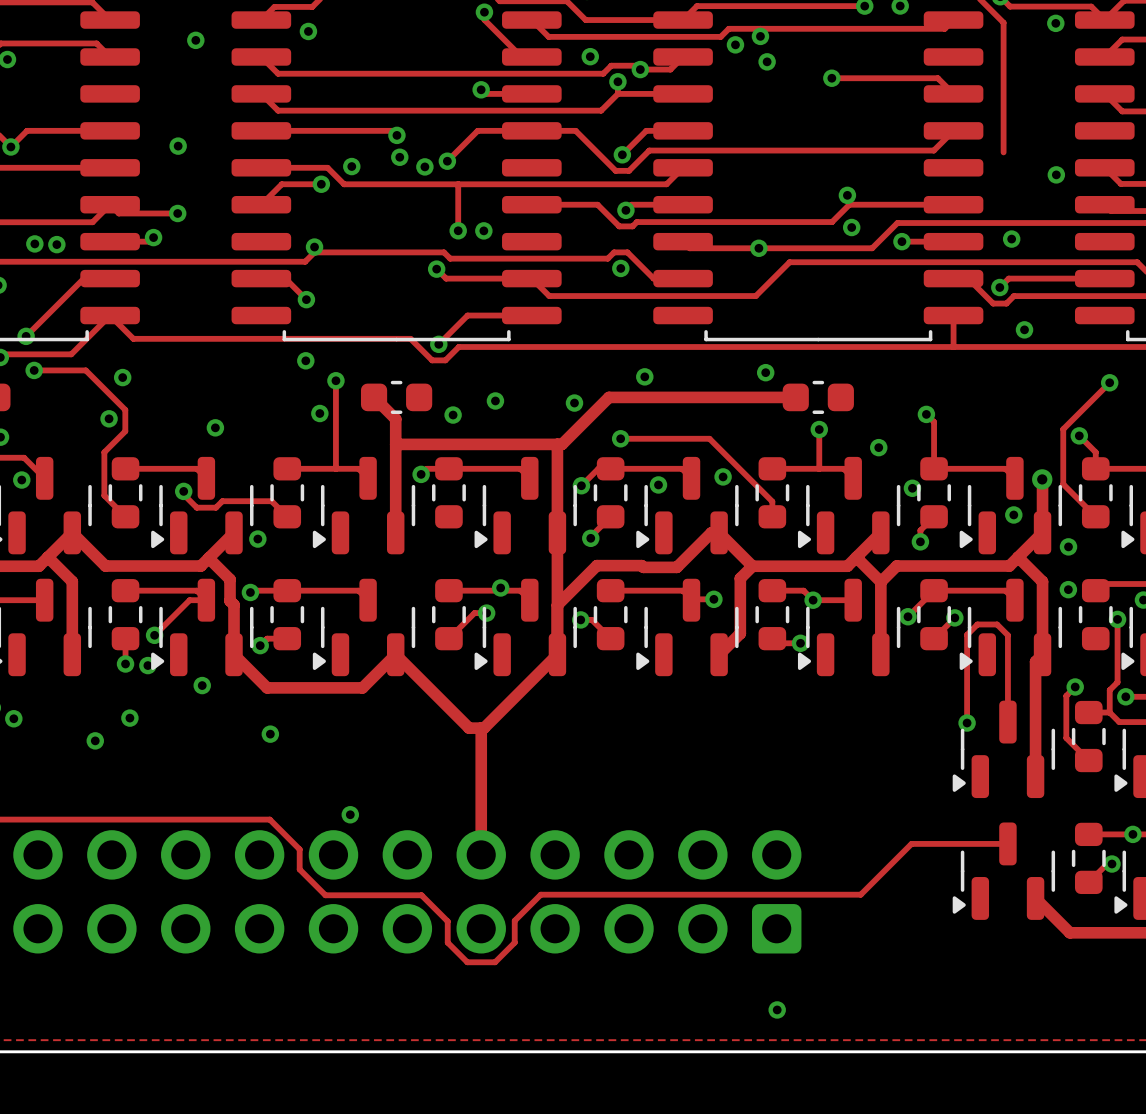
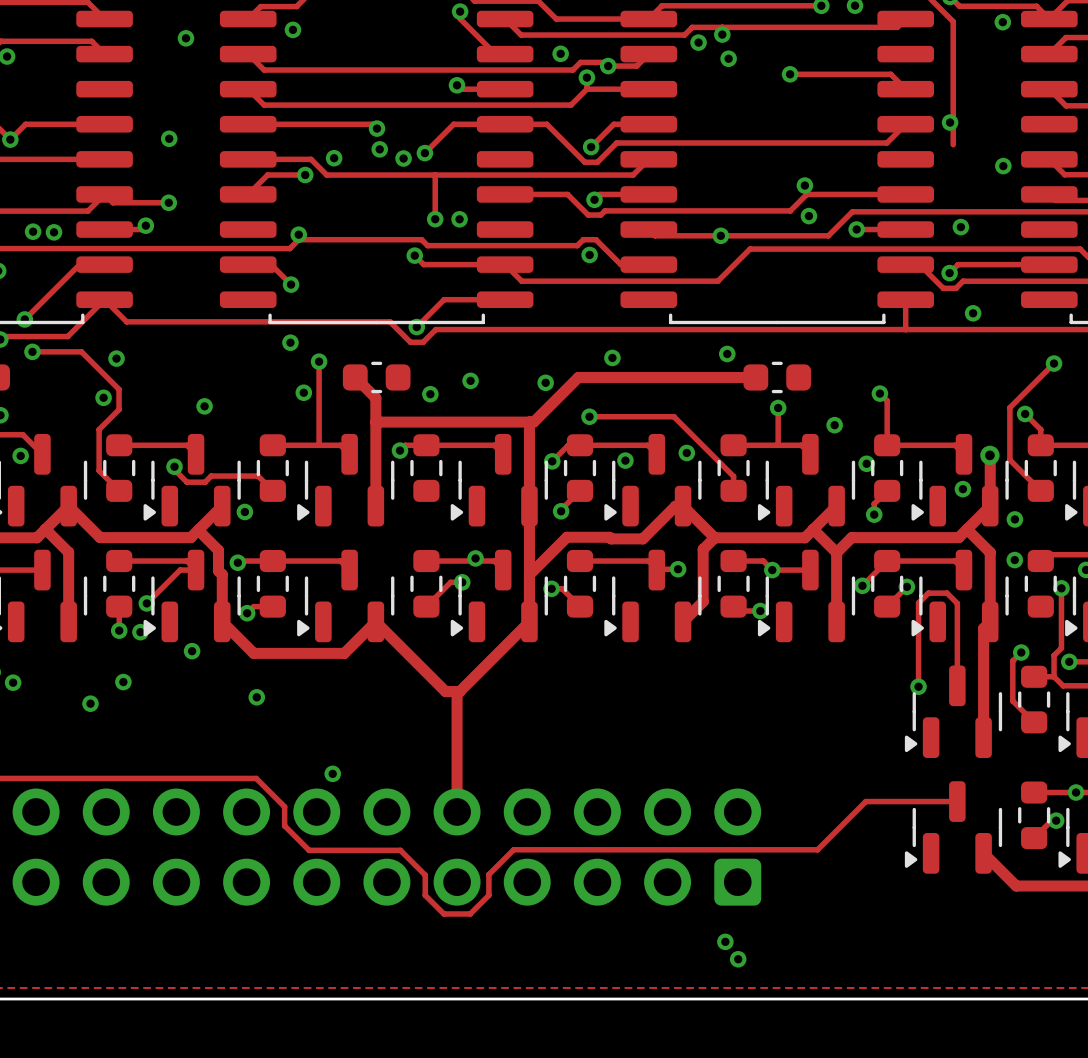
via: none -> (950, 122)
via: none -> (725, 941)

